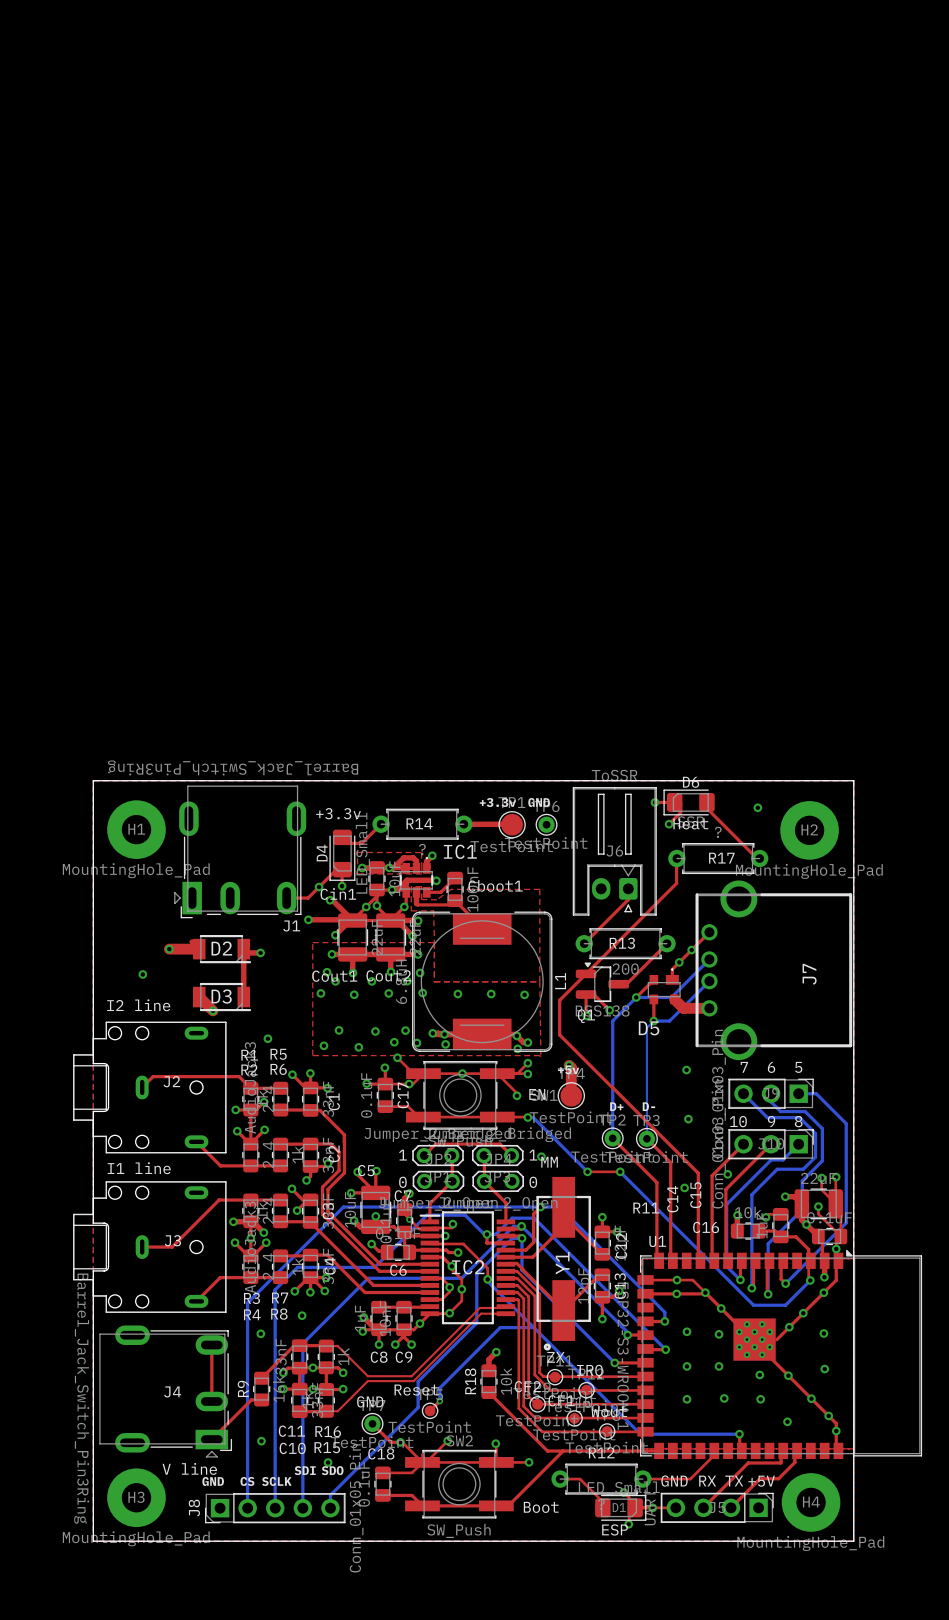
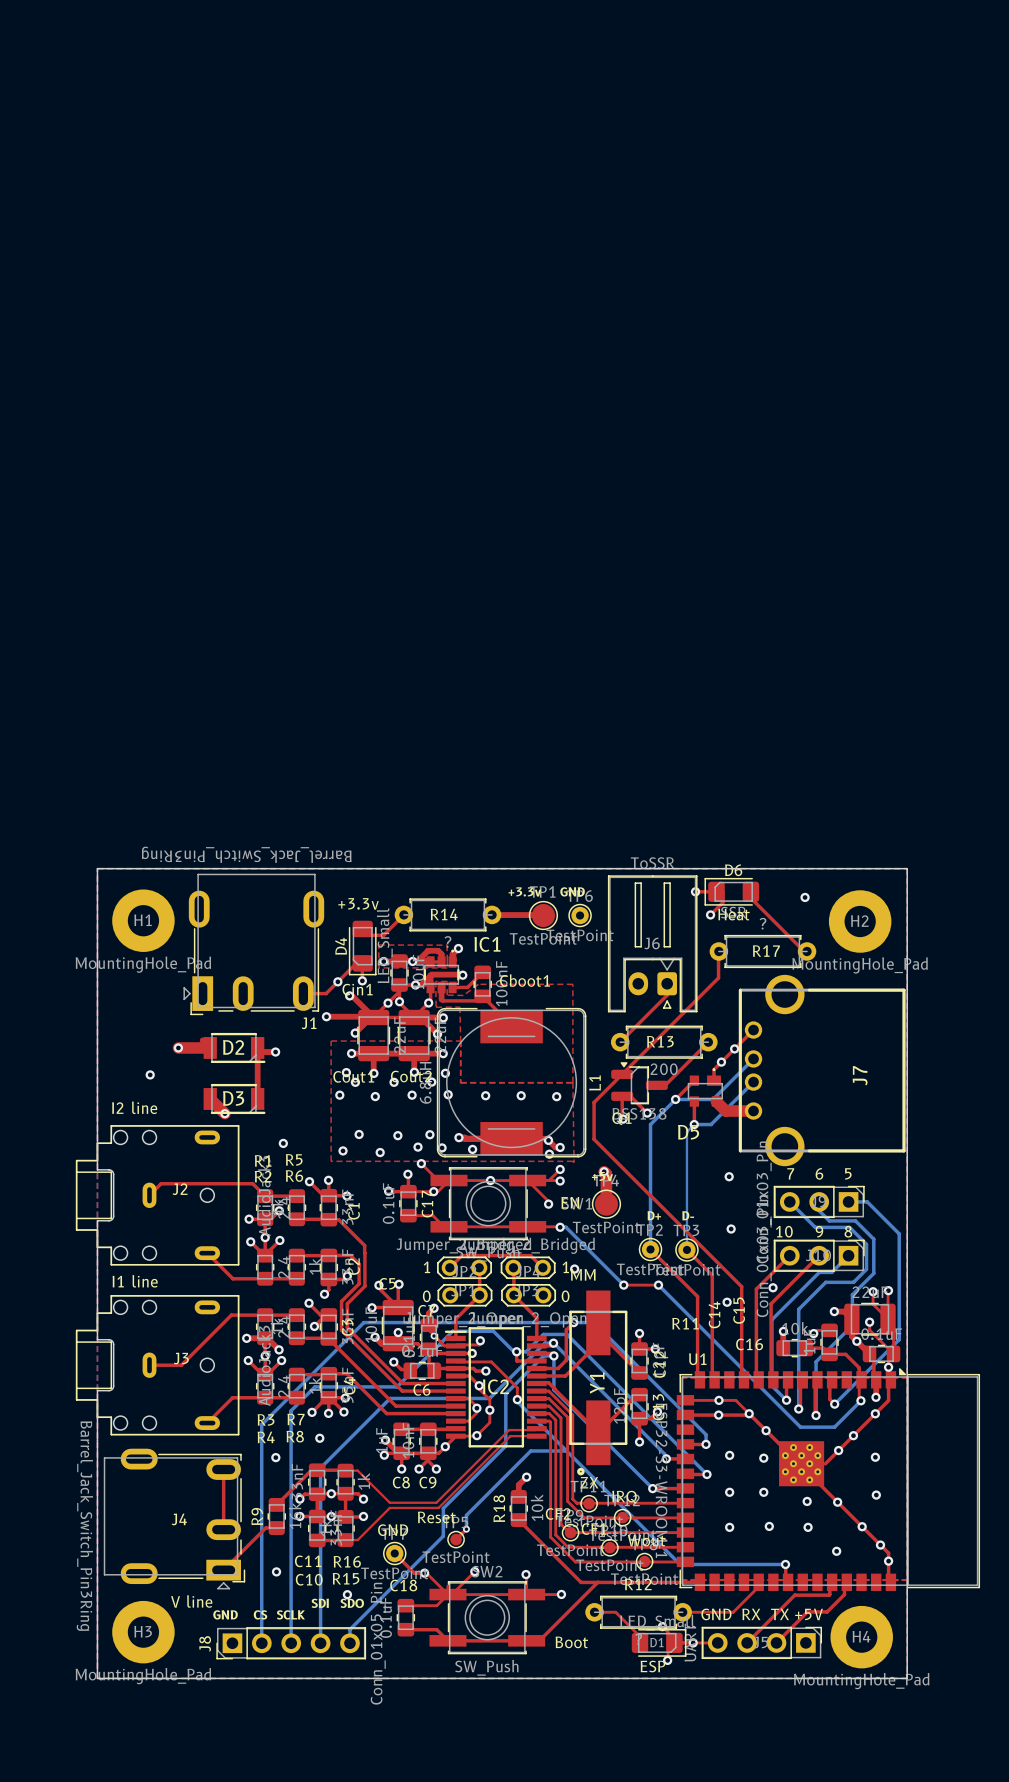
via: (444, 1034) -> none
via: none -> (265, 1237)

